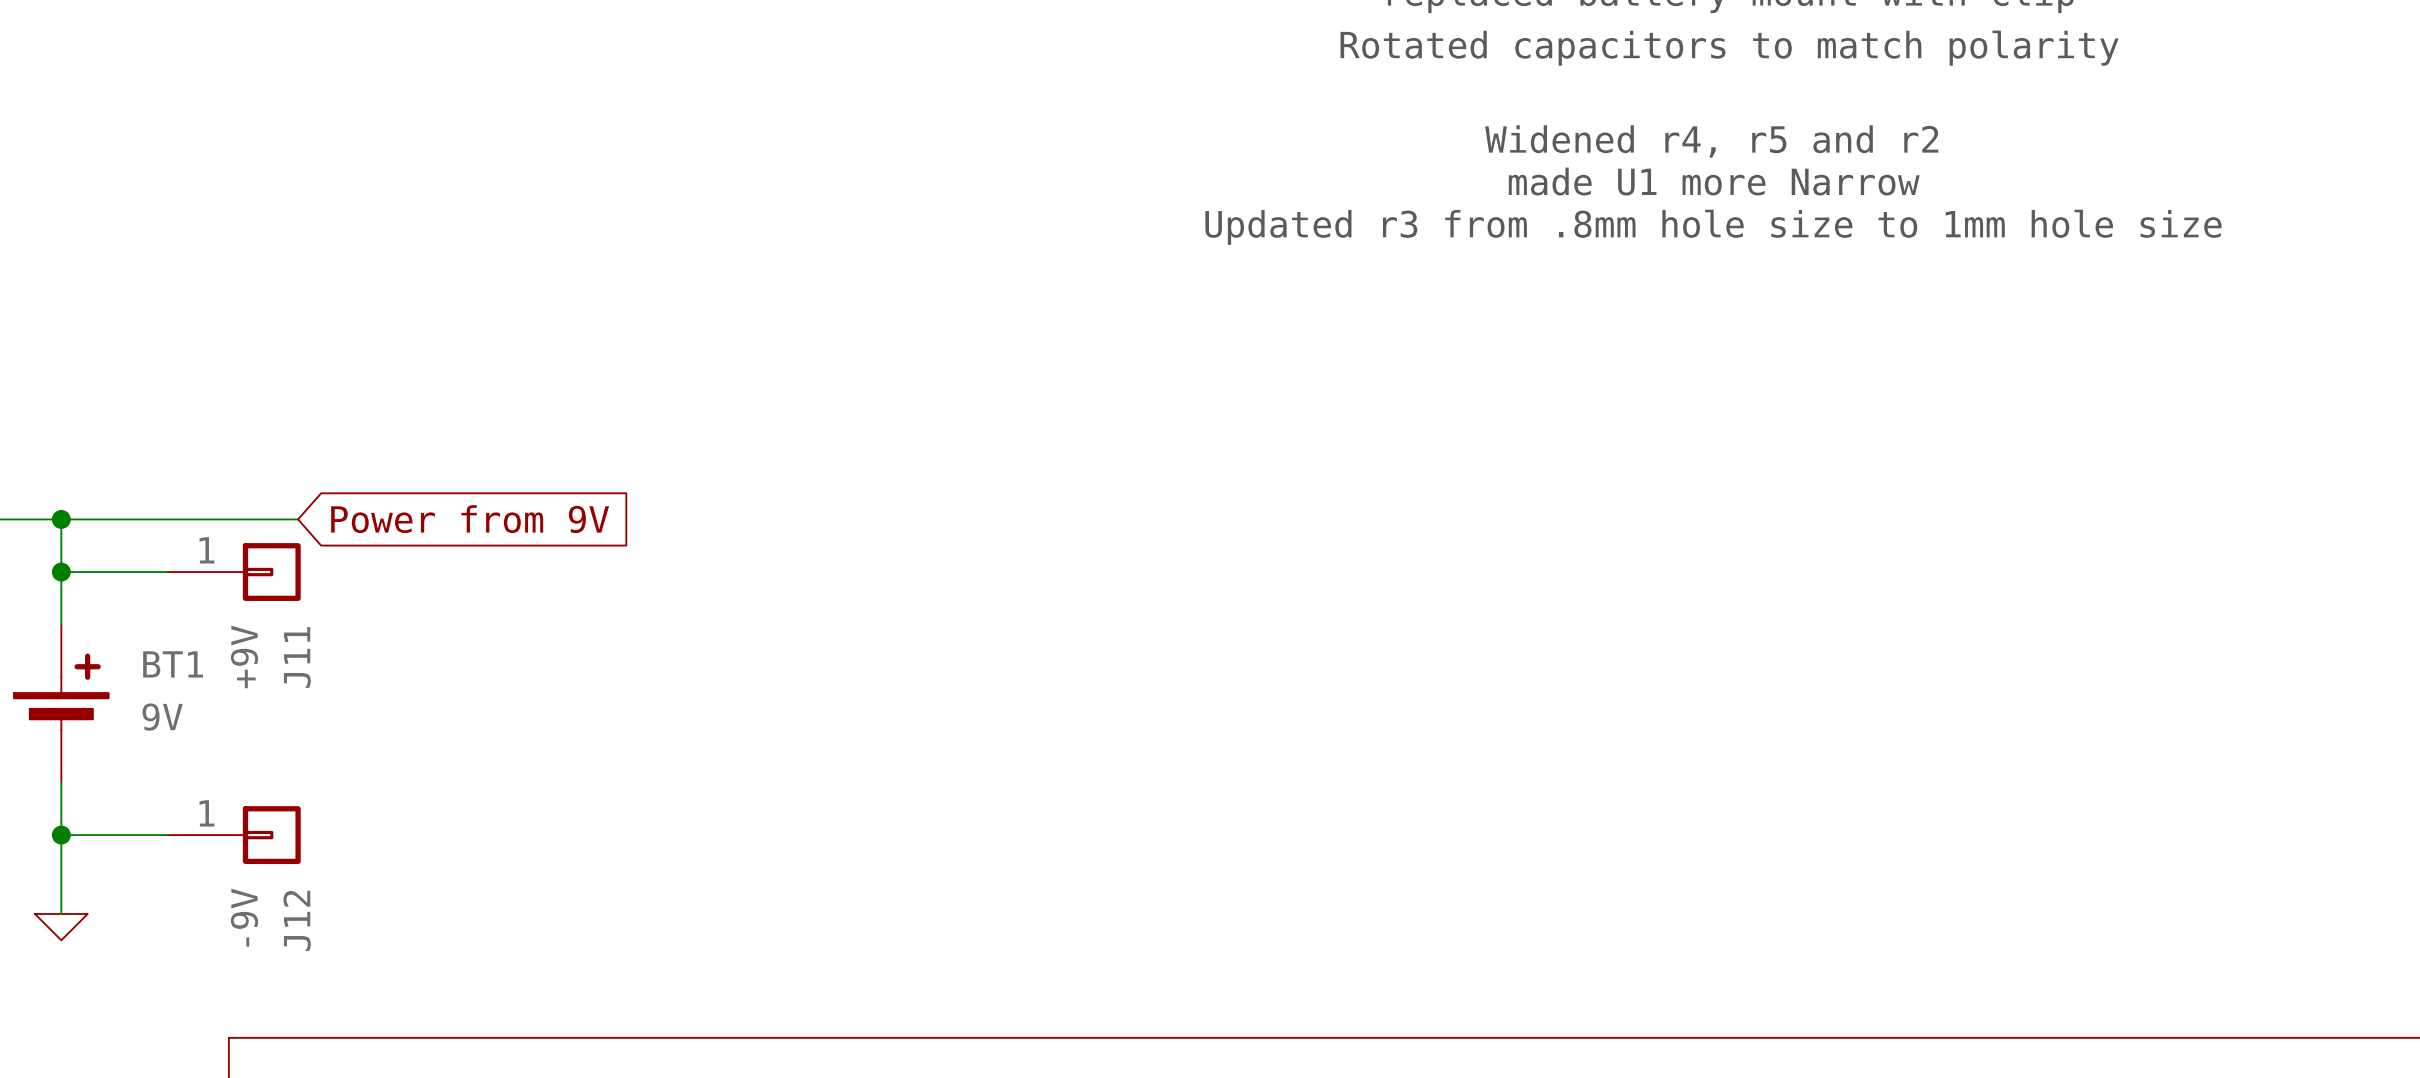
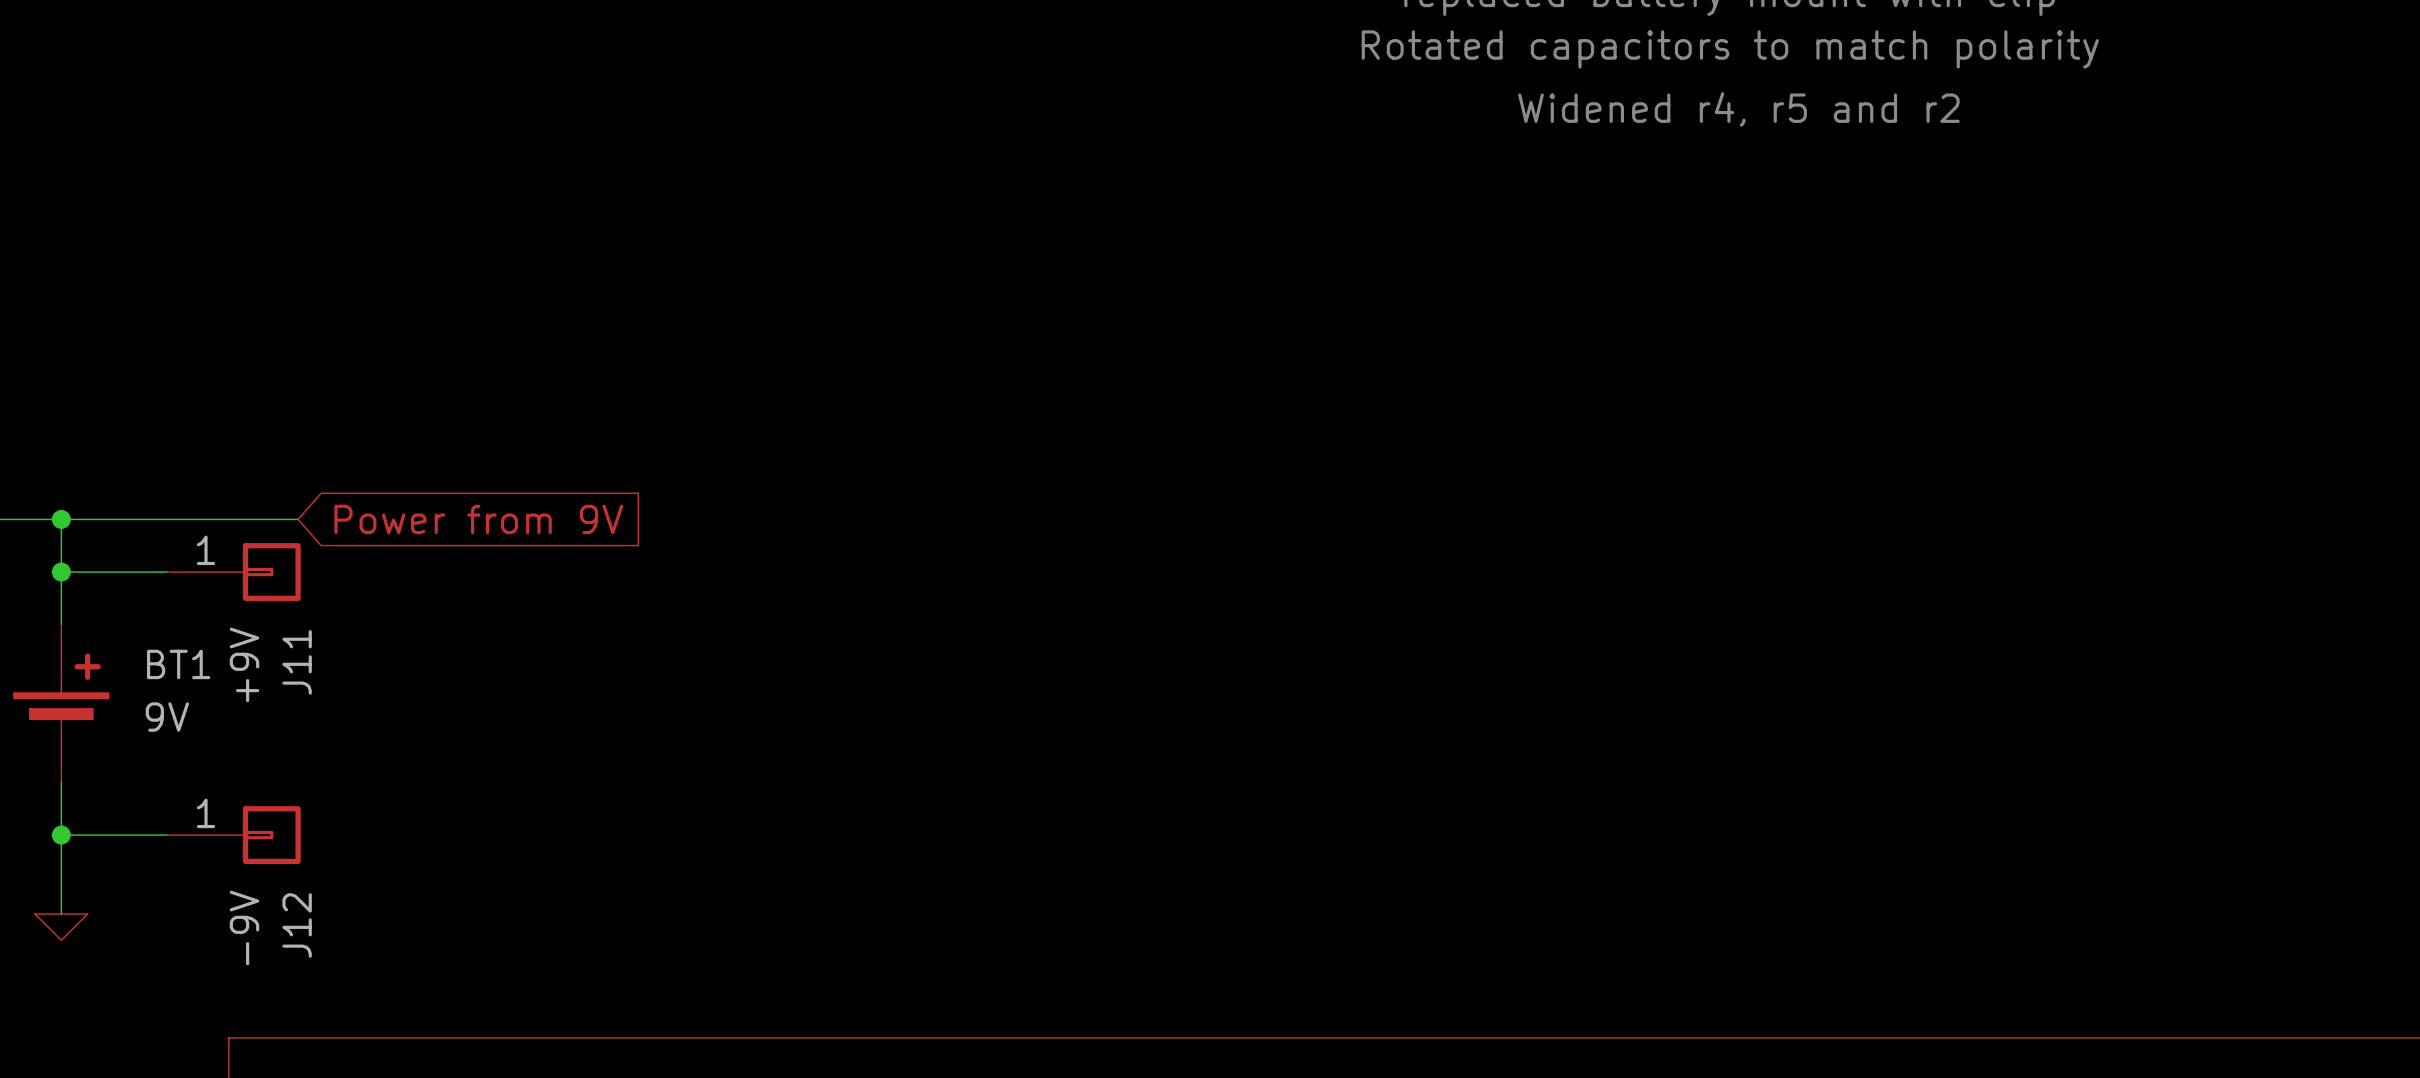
text position: Widened r4, r5 and r2 (1711, 141) -> Widened r4, r5 and r2 (1738, 109)
text: made U1 more Narrow (1714, 181) -> none
text: Updated r3 from .8mm hole size to 1mm hole size (1713, 227) -> none

